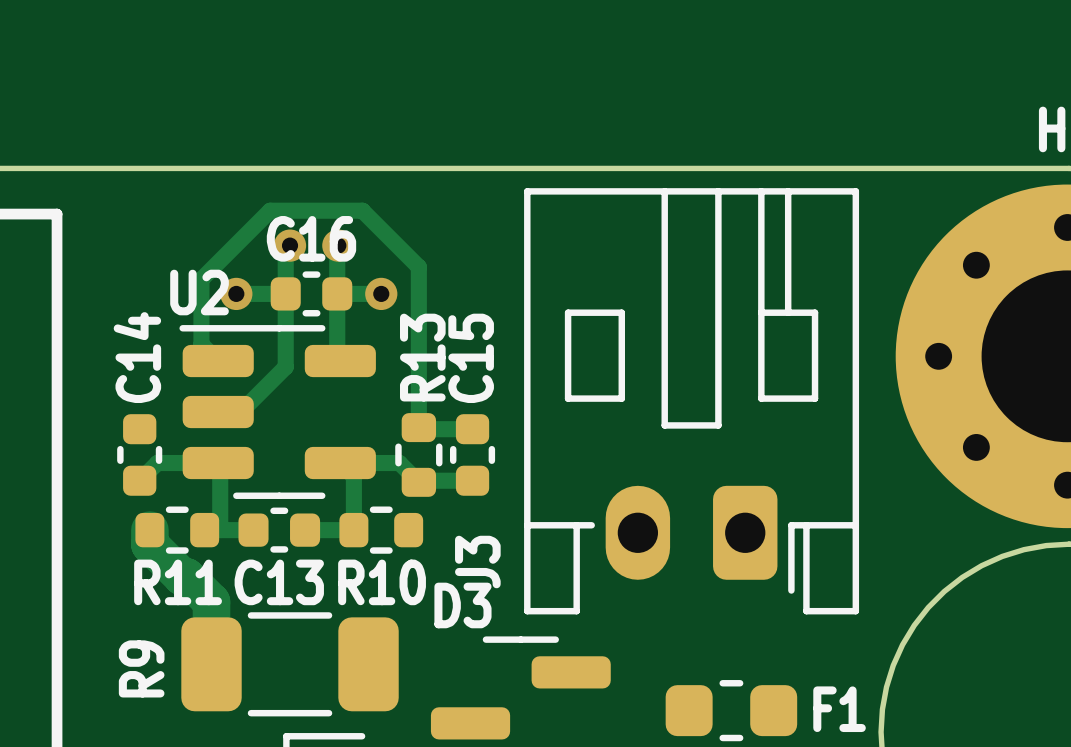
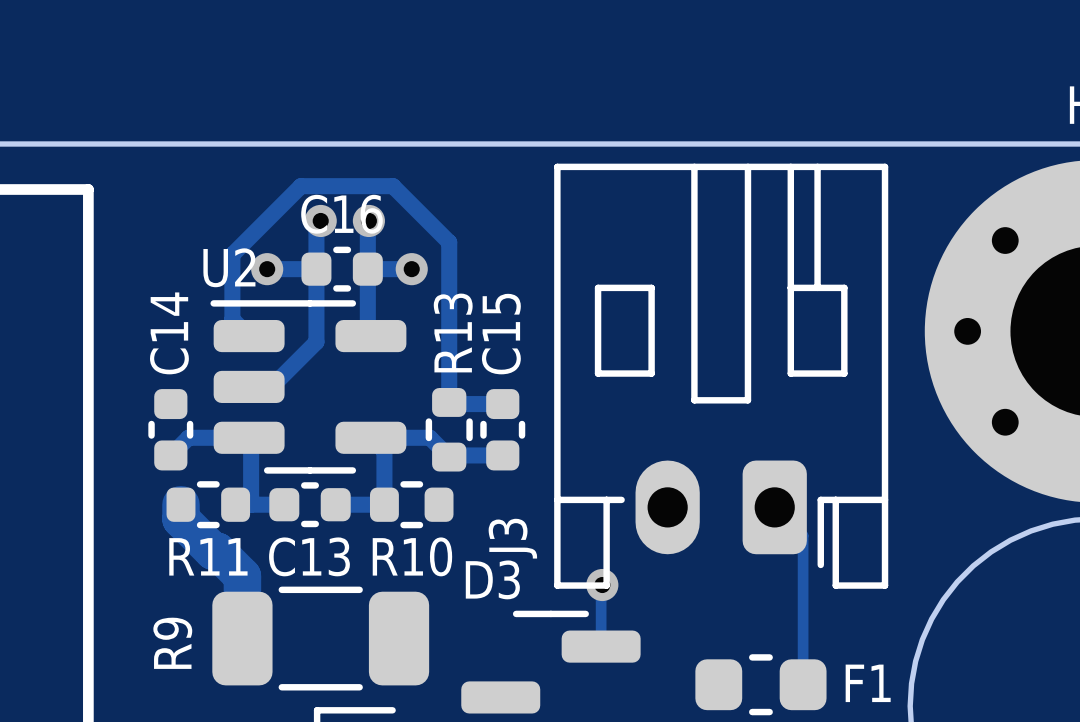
track: none -> (774, 507) (803, 535) (803, 684)
track: none -> (602, 585) (601, 646)
via: none -> (602, 585)

